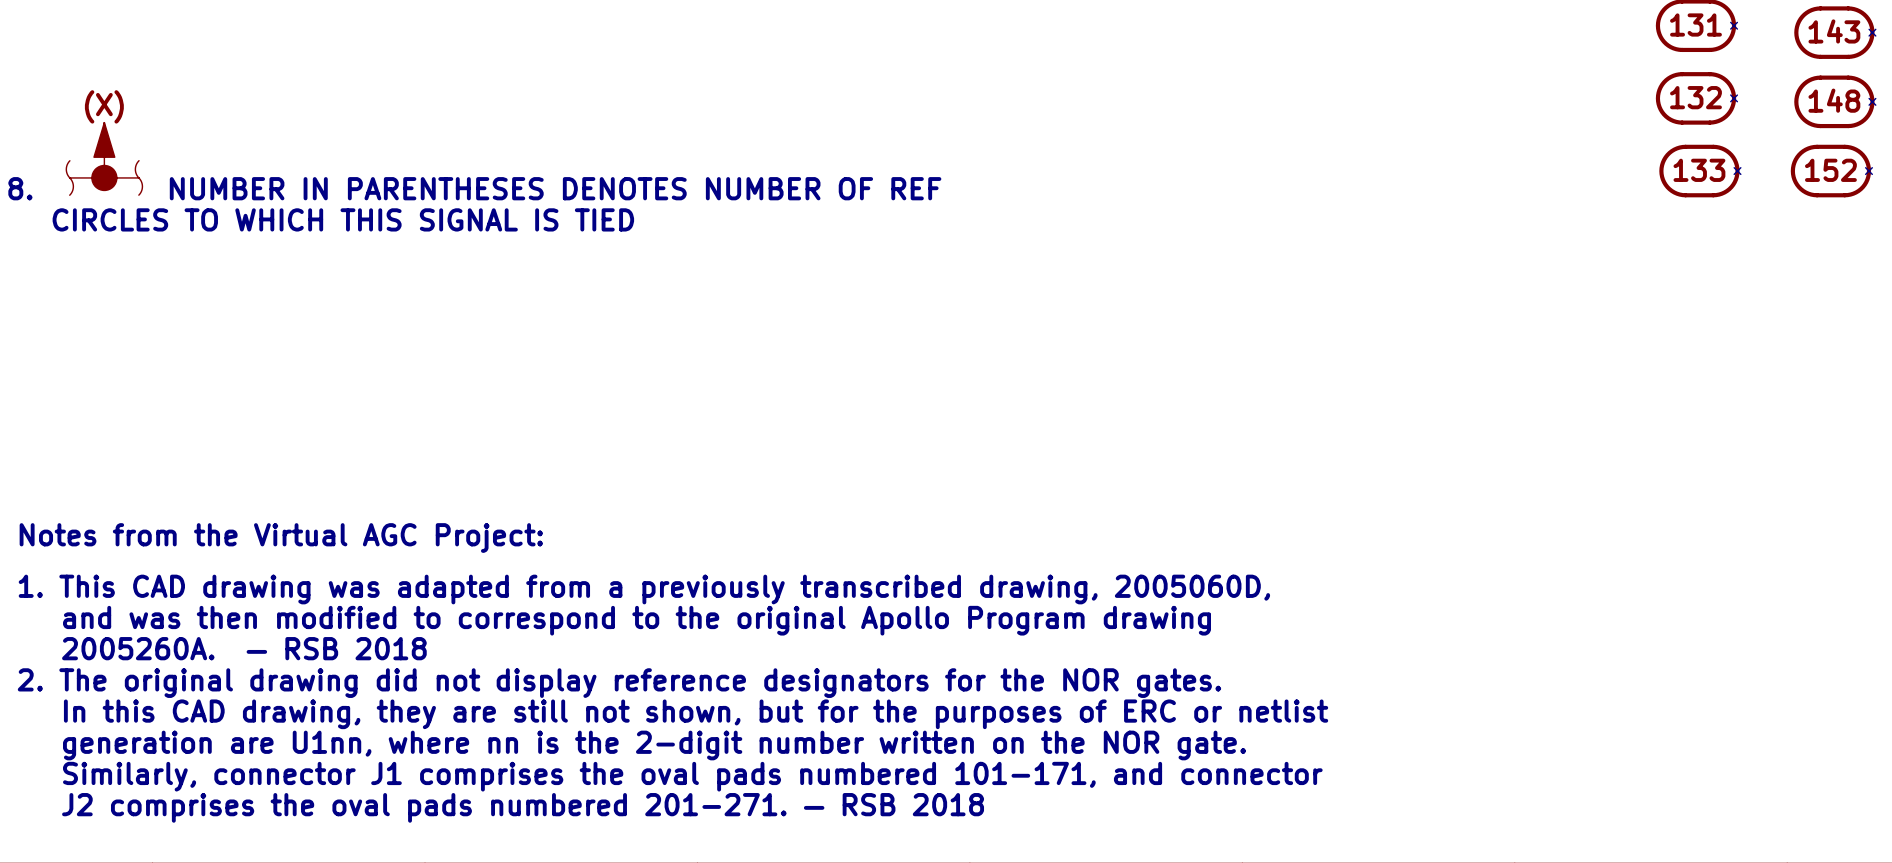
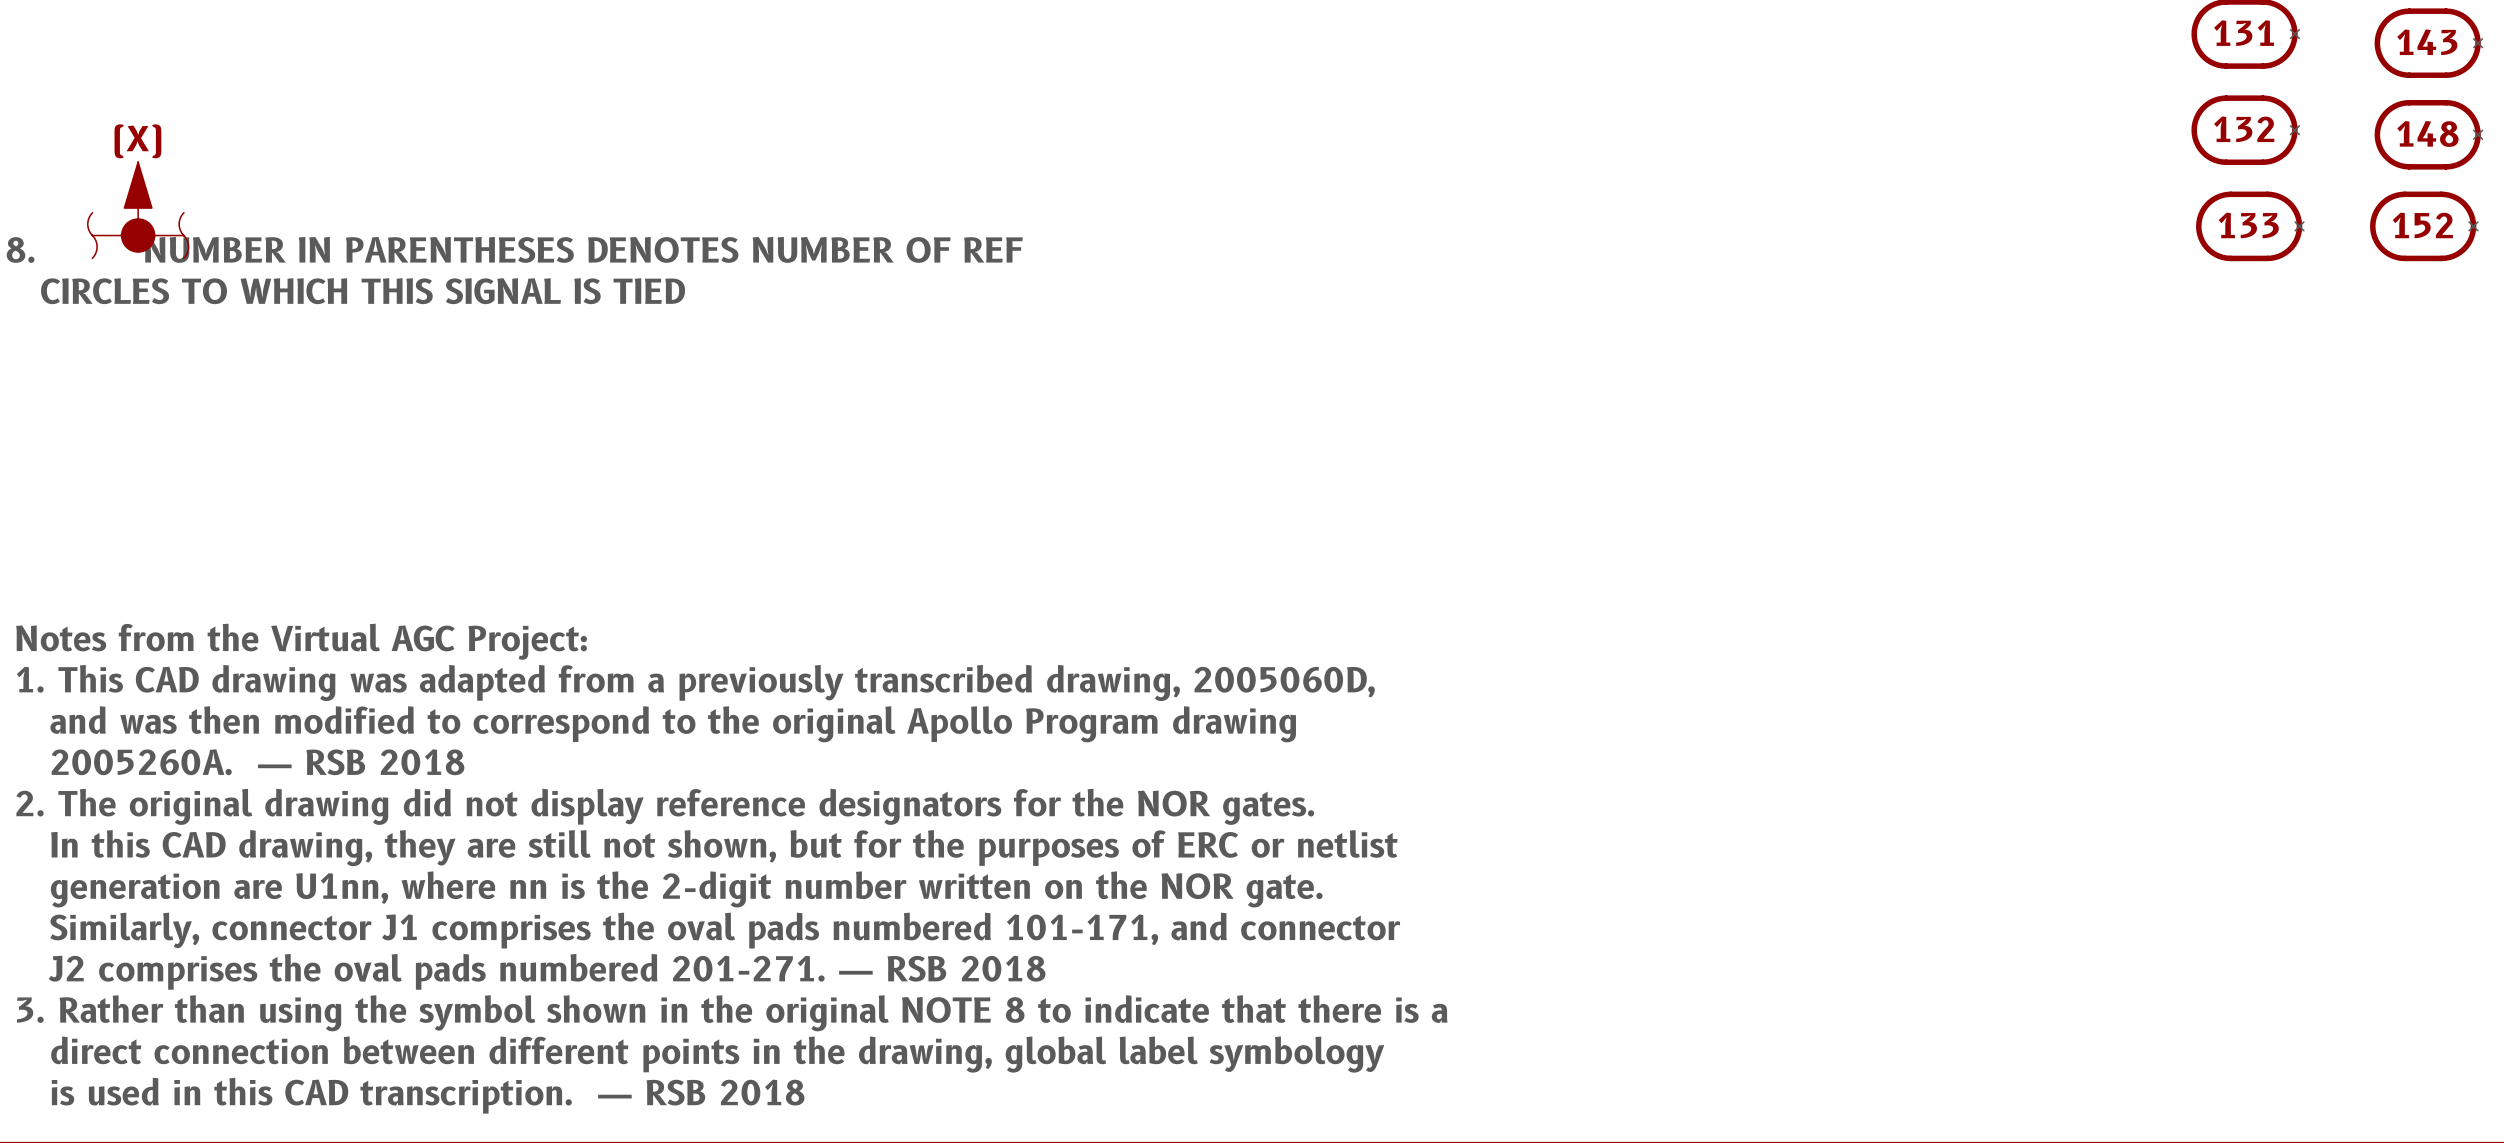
text position: Notes from the Virtual AGC Project: (281, 537) -> Notes from the Virtual AGC Project: (301, 641)
text position: 1. This CAD drawing was adapted from a previously transcribed drawing, 2005060D, (644, 589) -> 1. This CAD drawing was adapted from a previously transcribed drawing, 2005060D, (695, 682)
text position: and was then modified to correspond to the original Apollo Program drawing (637, 620) -> and was then modified to correspond to the original Apollo Program drawing (673, 724)
text position: 2005260A. — RSB 2018 (244, 648) -> 2005260A. — RSB 2018 (258, 762)
text position: 2. The original drawing did not display reference designators for the NOR gates. (619, 683) -> 2. The original drawing did not display reference designators for the NOR gates. (665, 806)
text position: In this CAD drawing, they are still not shown, but for the purposes of ERC or netlist (696, 714) -> In this CAD drawing, they are still not shown, but for the purposes of ERC or netlist (724, 848)
text position: generation are U1nn, where nn is the 2-digit number written on the NOR gate. (654, 745) -> generation are U1nn, where nn is the 2-digit number written on the NOR gate. (686, 889)
text: none -> 3. Rather than using the symbol shown in the original NOTE 8 to indicate that there is a (732, 1013)
text position: Similarly, connector J1 comprises the oval pads numbered 101-171, and connector (692, 776) -> Similarly, connector J1 comprises the oval pads numbered 101-171, and connector (725, 930)
text: none -> direct connection between different points in the drawing, global label symbology (717, 1054)
text position: J2 comprises the oval pads numbered 201-271. — RSB 2018 (523, 807) -> J2 comprises the oval pads numbered 201-271. — RSB 2018 (547, 971)
text: none -> is used in this CAD transcription. — RSB 2018 (428, 1095)

